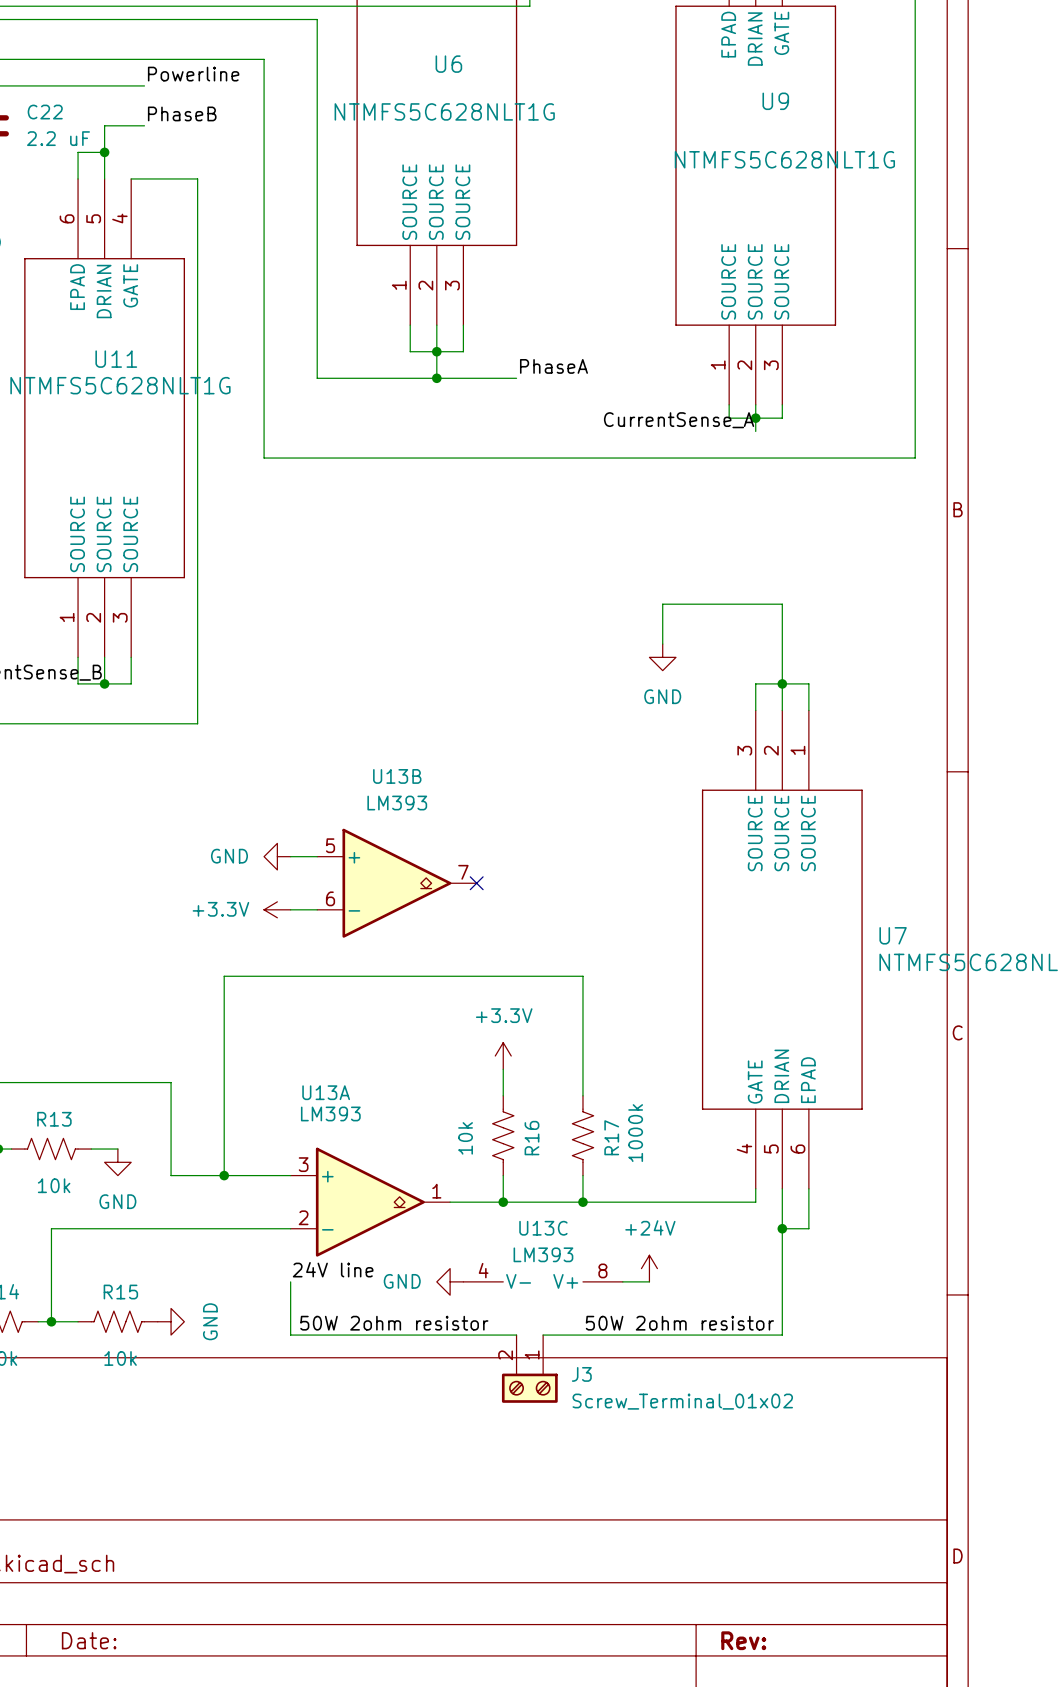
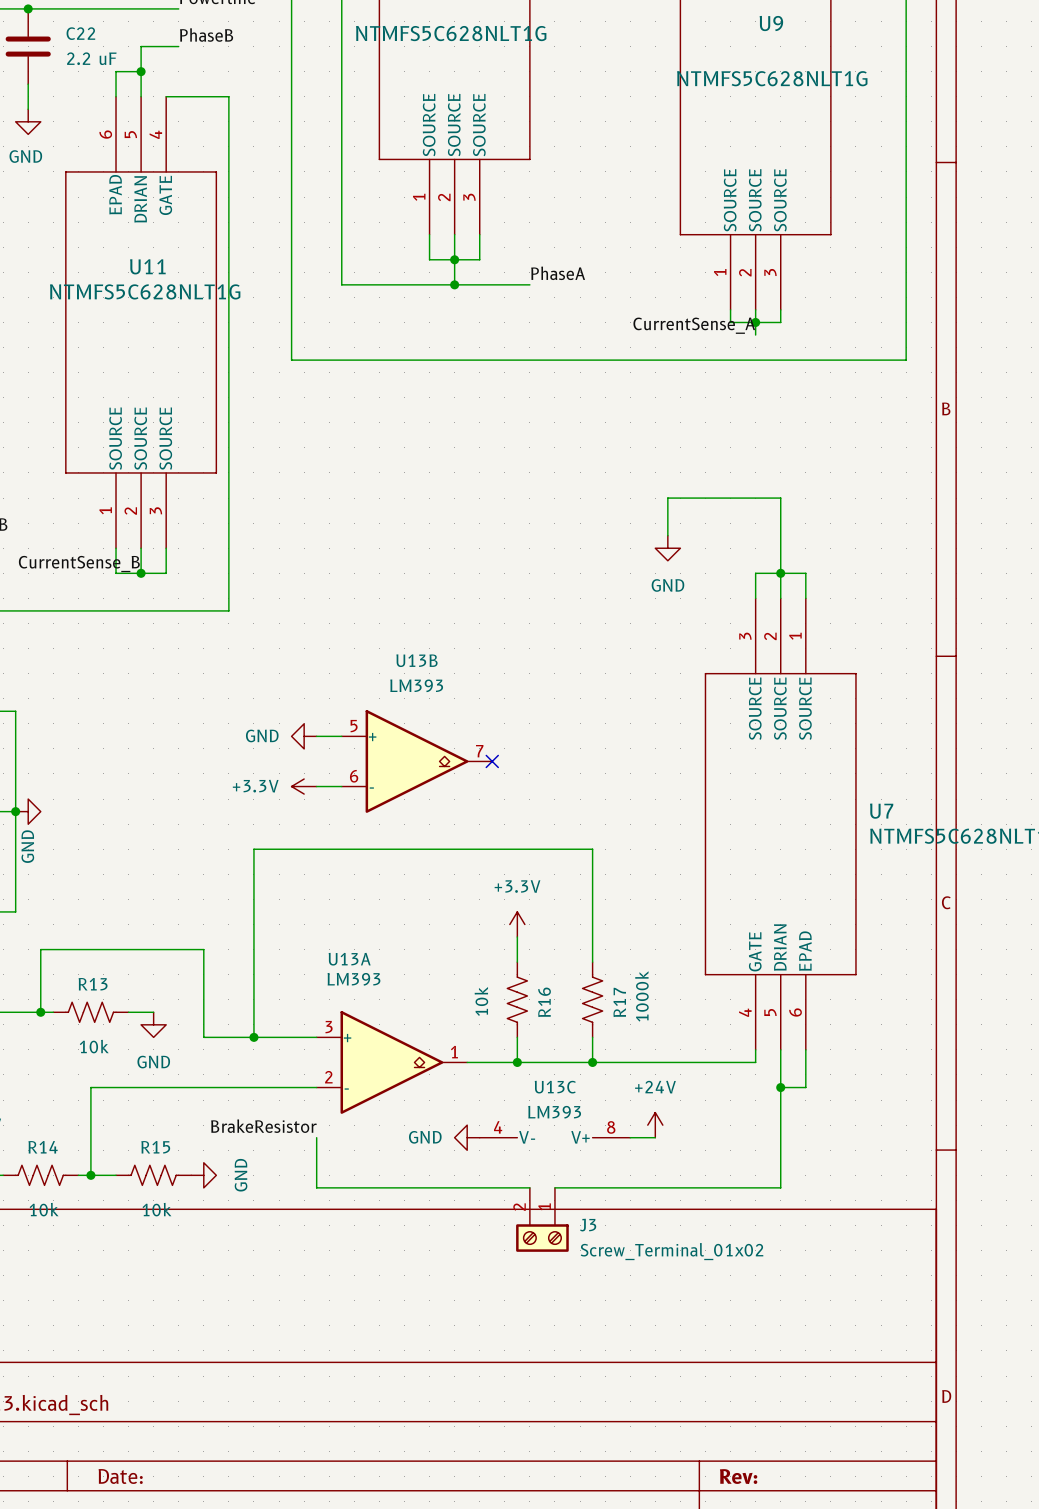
label: 24V line (333, 1269) -> BrakeResistor (263, 1126)
label: 50W 2ohm resistor (394, 1323) -> none
label: 50W 2ohm resistor (679, 1323) -> none

